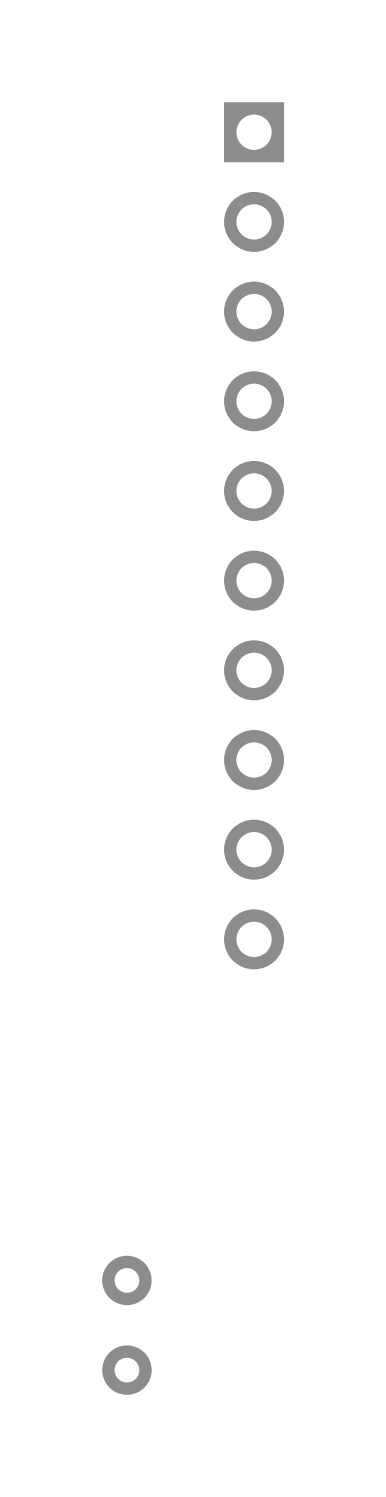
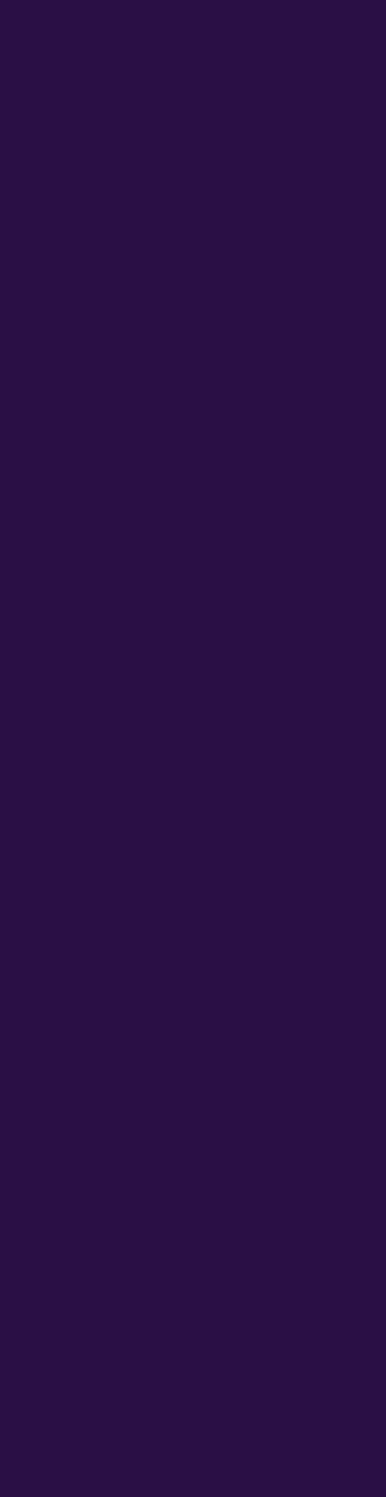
part: (254, 535) -> none
part: (126, 1325) -> none

